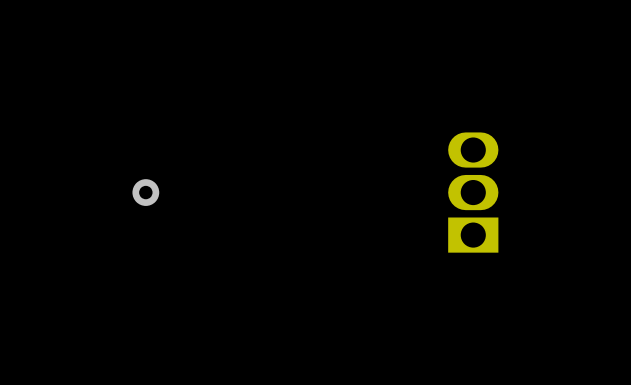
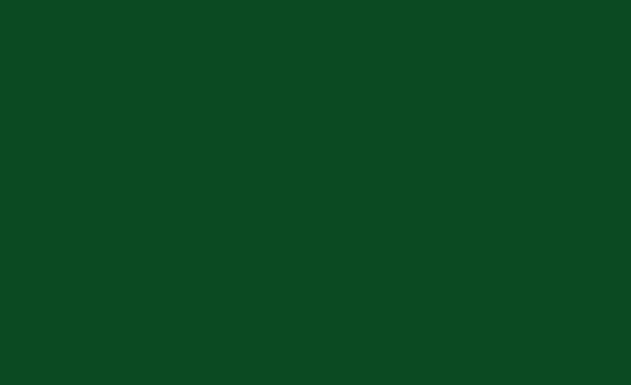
via: (145, 192) -> none
part: (473, 192) -> none

